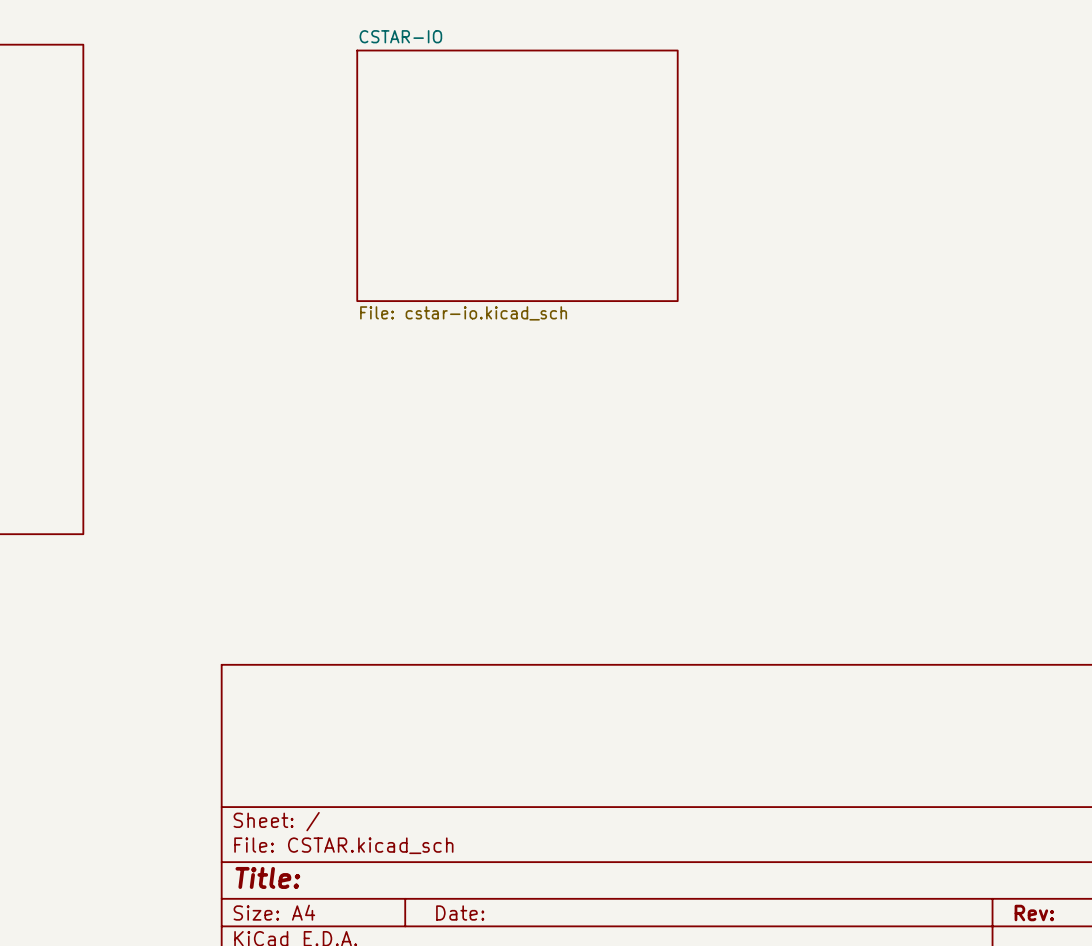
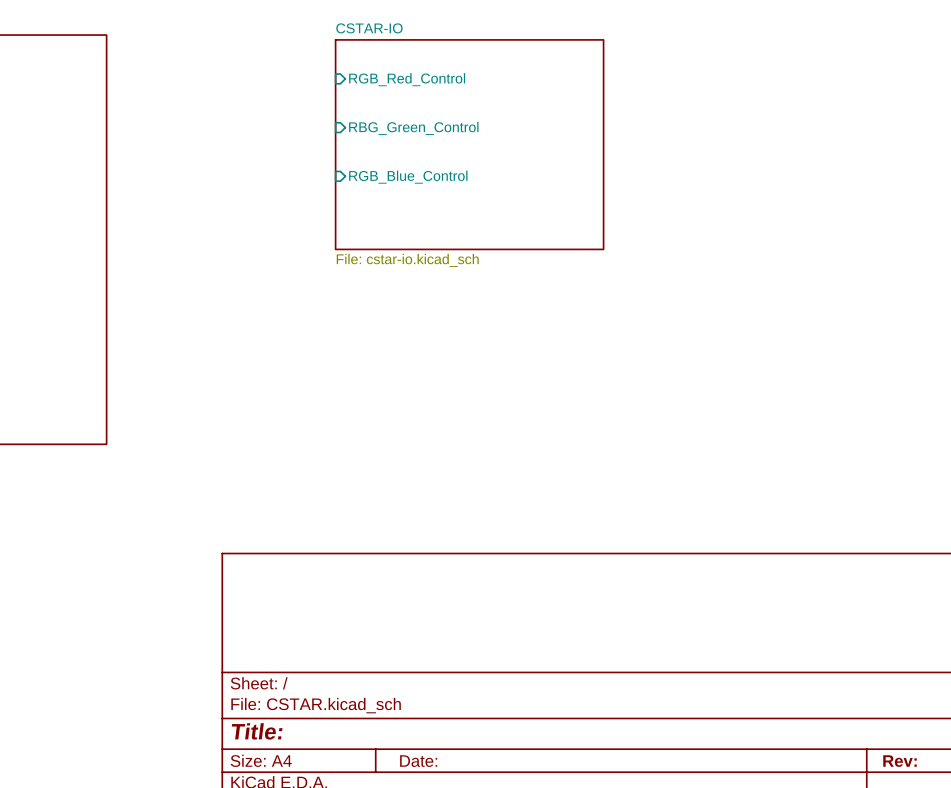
sheet pin: none -> RGB_Red_Control (407, 79)
sheet pin: none -> RBG_Green_Control (413, 128)
sheet pin: none -> RGB_Blue_Control (408, 177)

